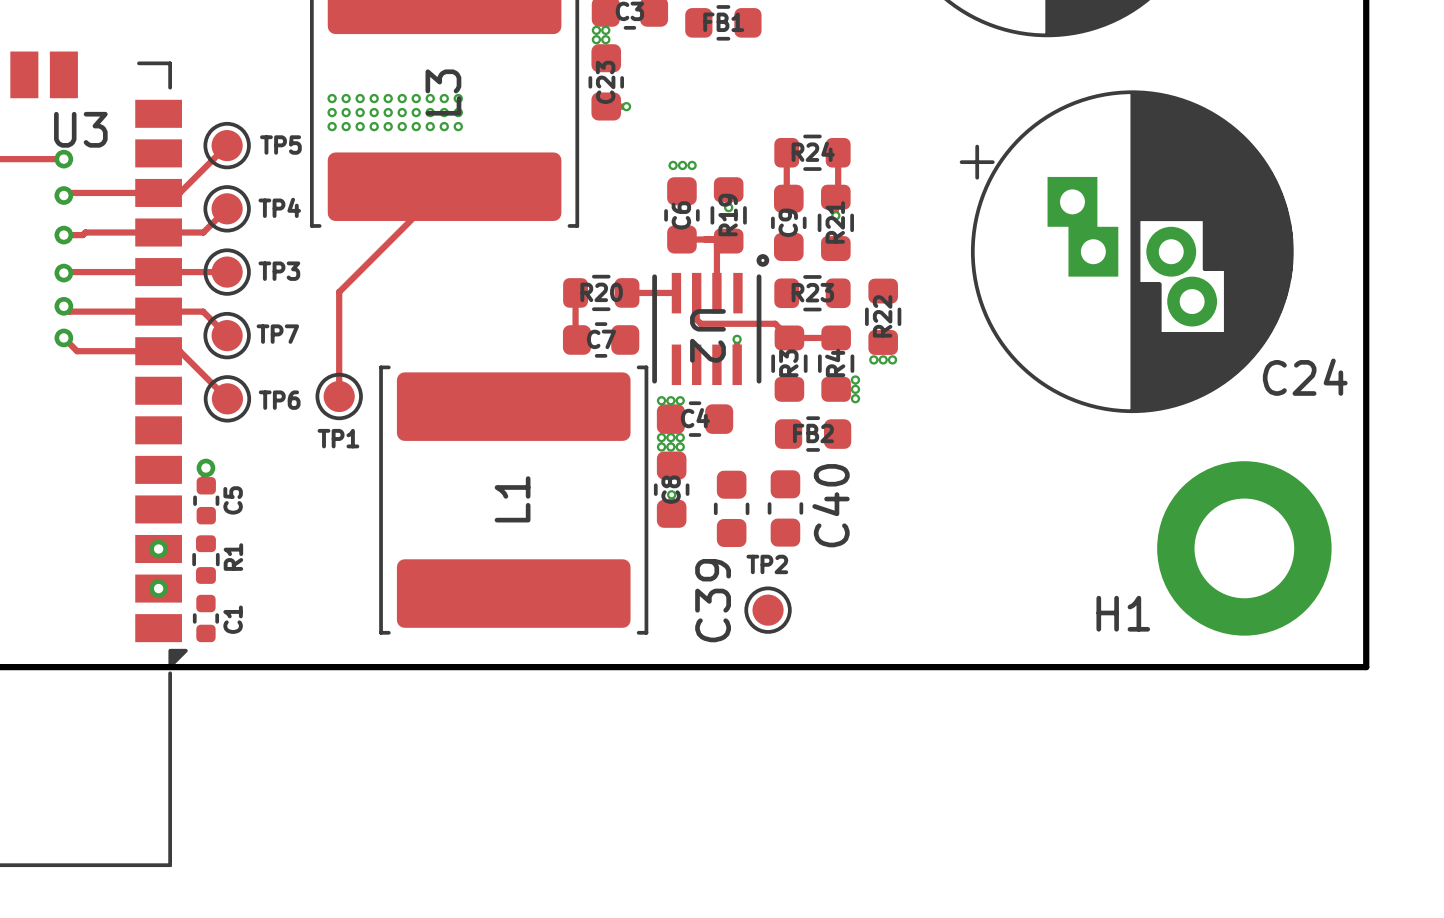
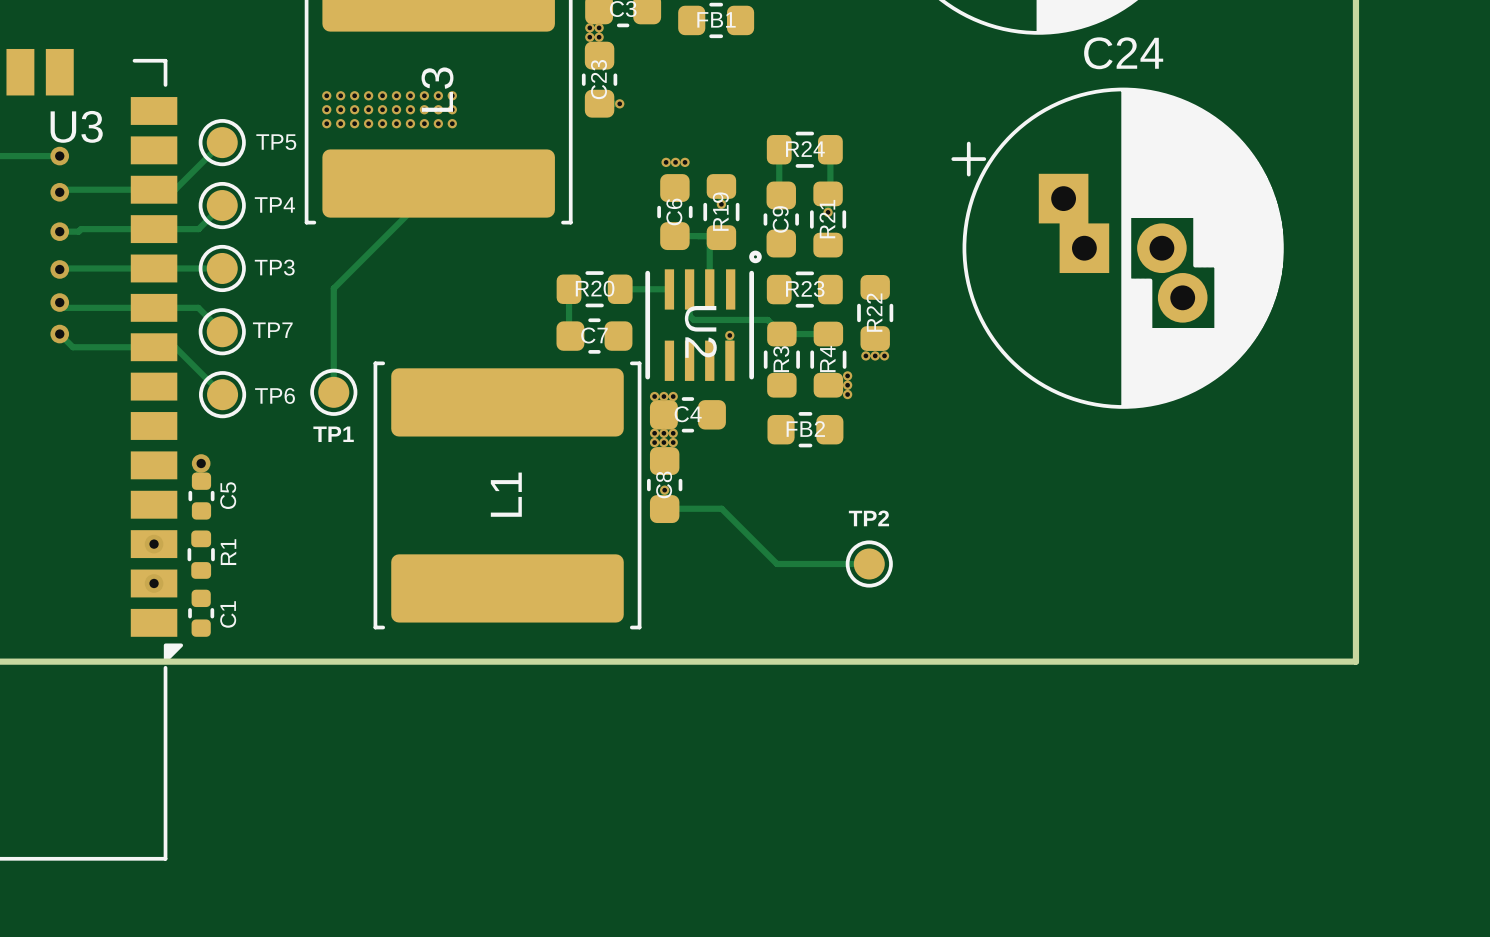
C24 name position: C24 (1305, 377) -> C24 (1123, 53)
C39: (731, 508) -> none
C40: (785, 508) -> none
track: none -> (664, 508) (721, 508) (776, 564) (869, 564)
H1: (1244, 548) -> none
TP2 position: (768, 610) -> (869, 564)

